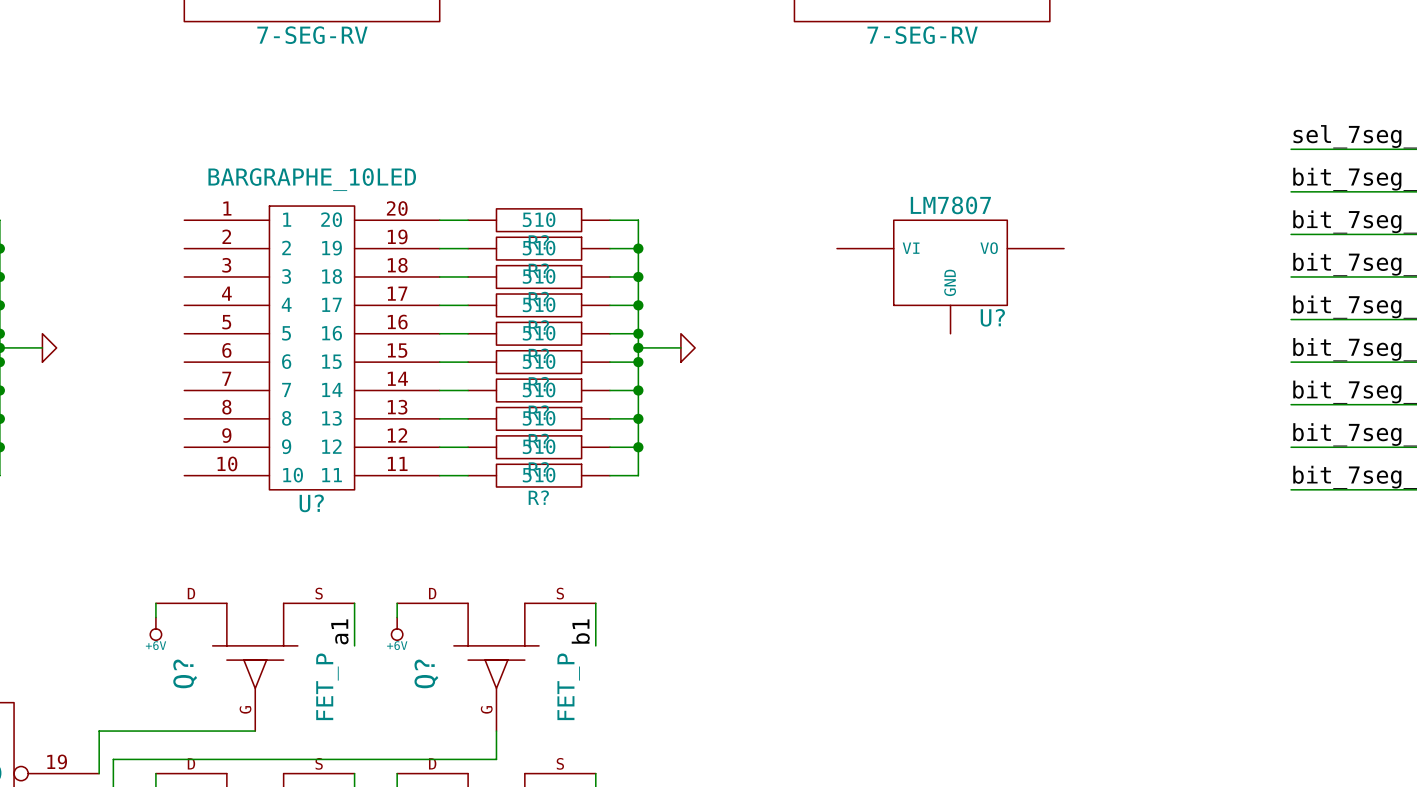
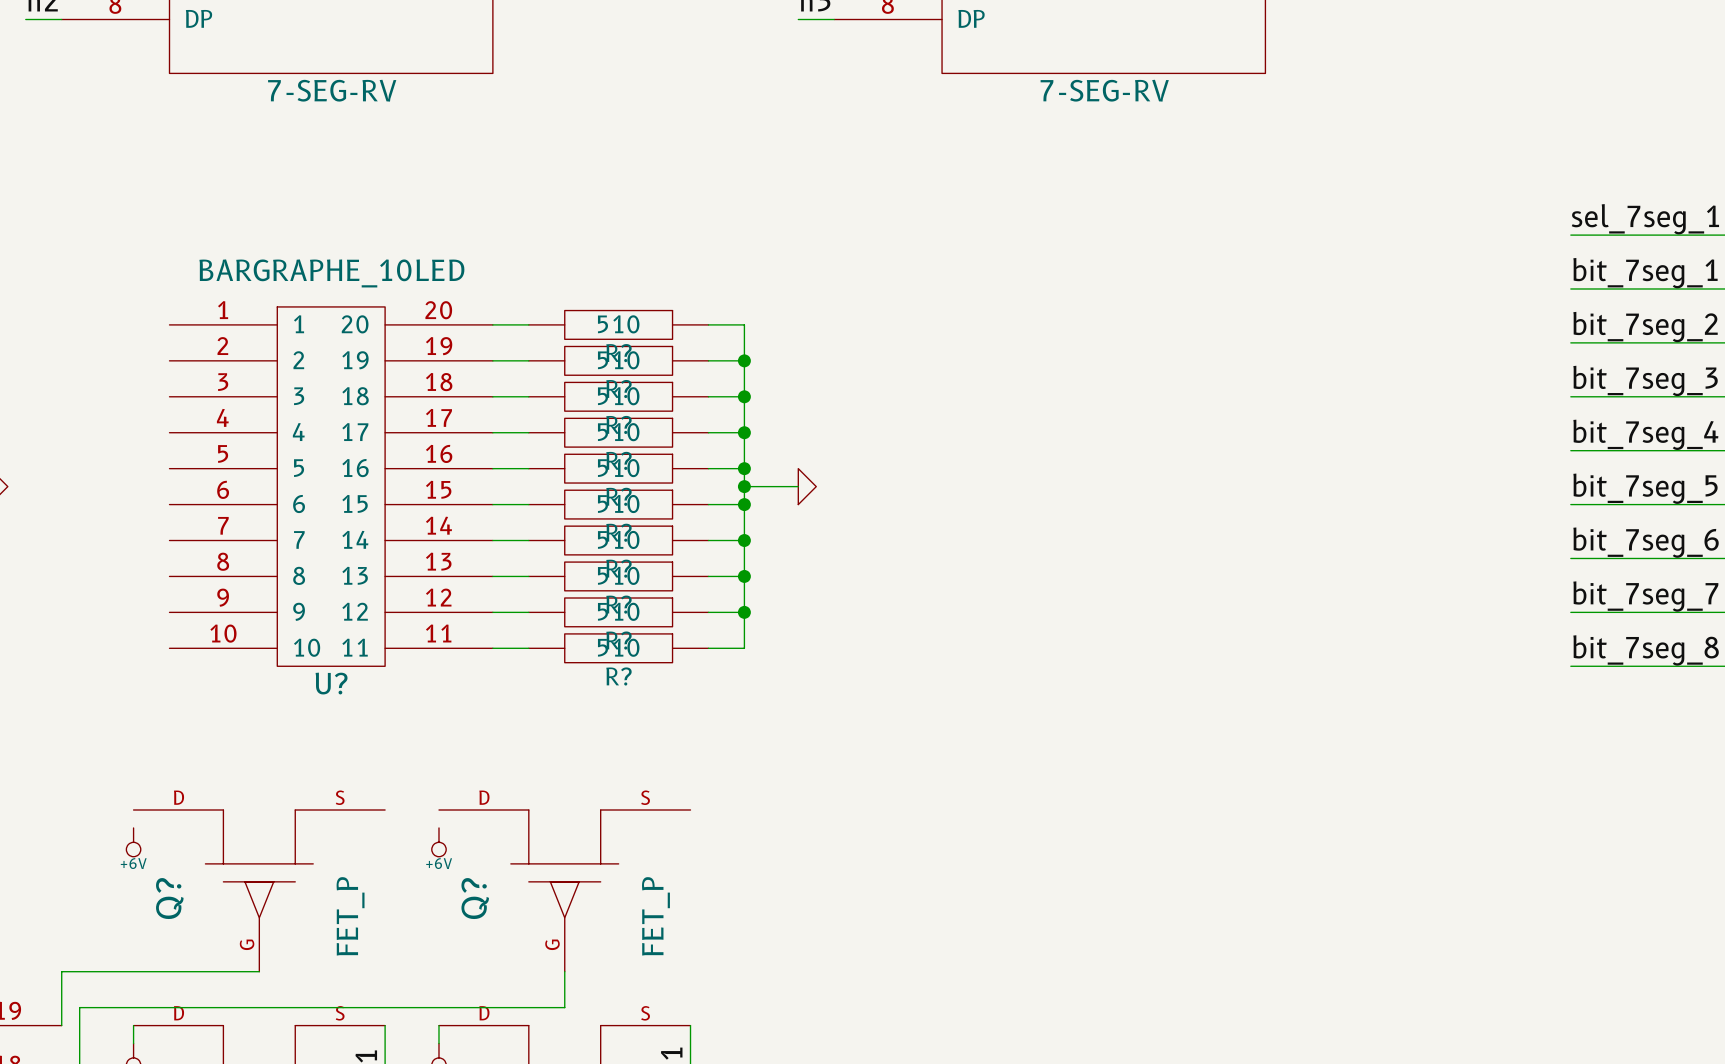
U?: LM7807 (950, 276) -> none
wire: (155, 603) (155, 617) -> none
wire: (354, 603) (354, 645) -> none
wire: (397, 603) (397, 617) -> none
wire: (595, 603) (595, 645) -> none
label: a1 (339, 631) -> none
label: b1 (580, 631) -> none

